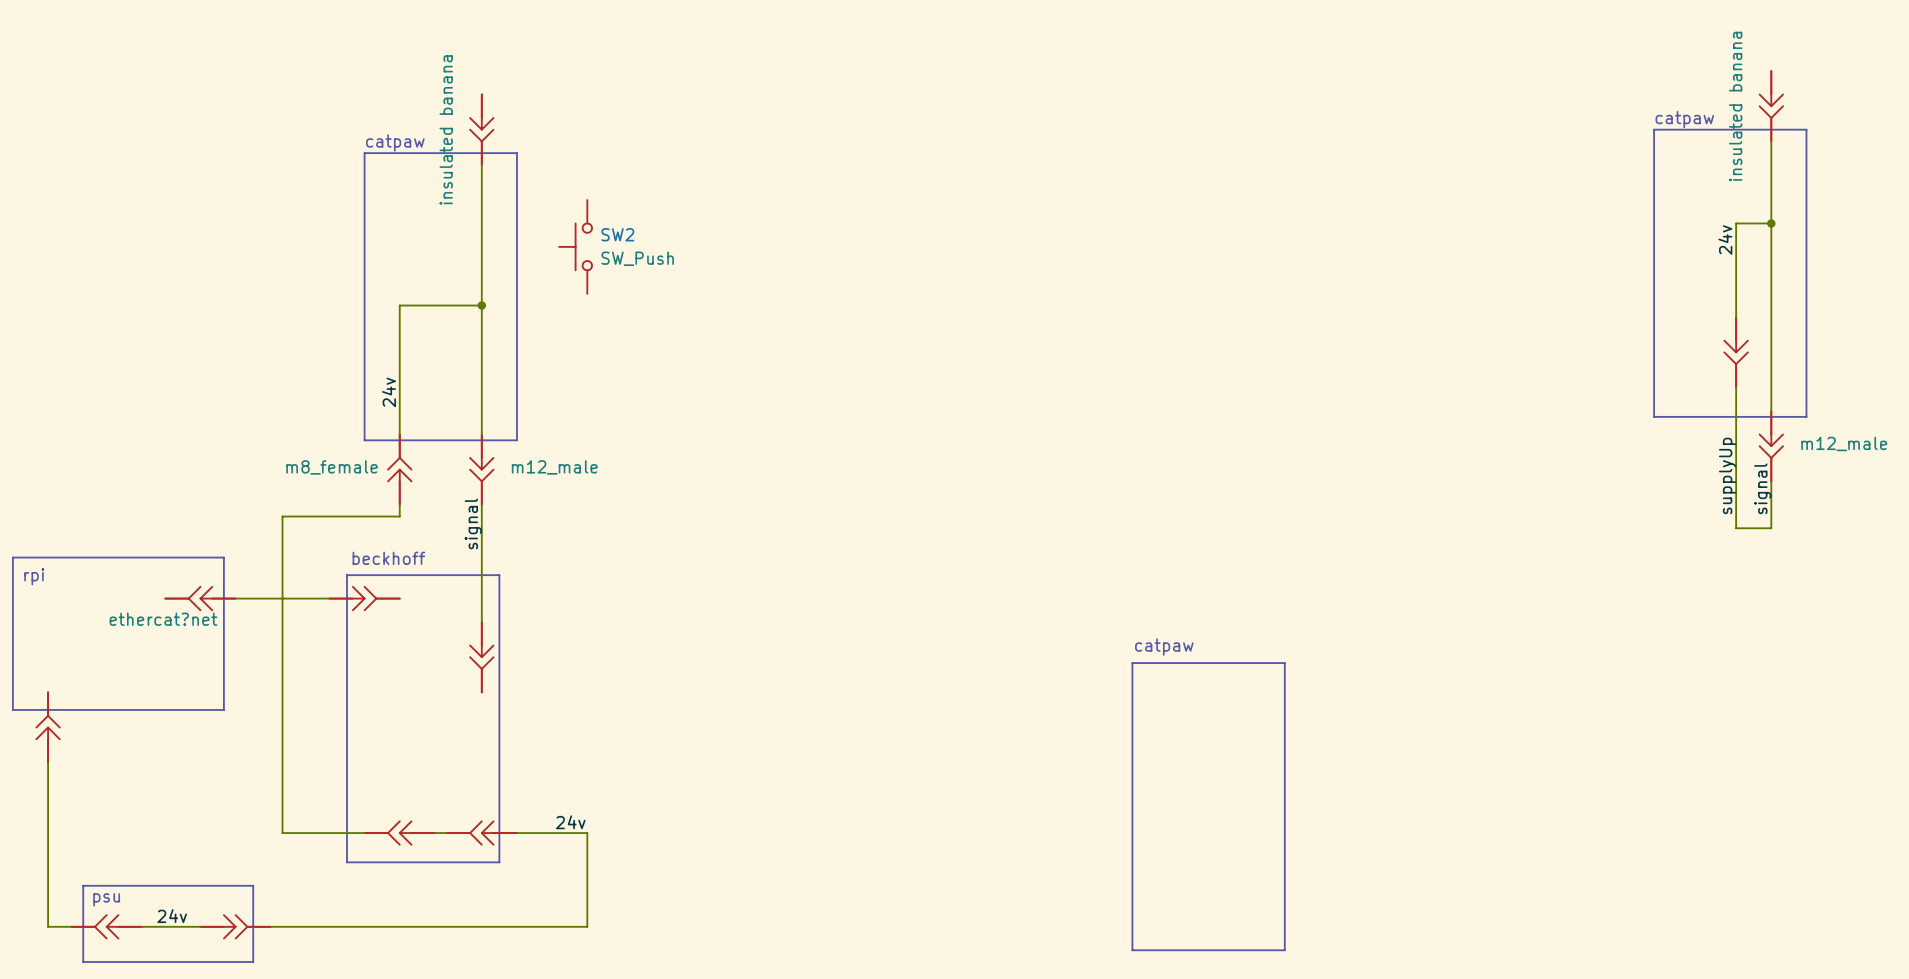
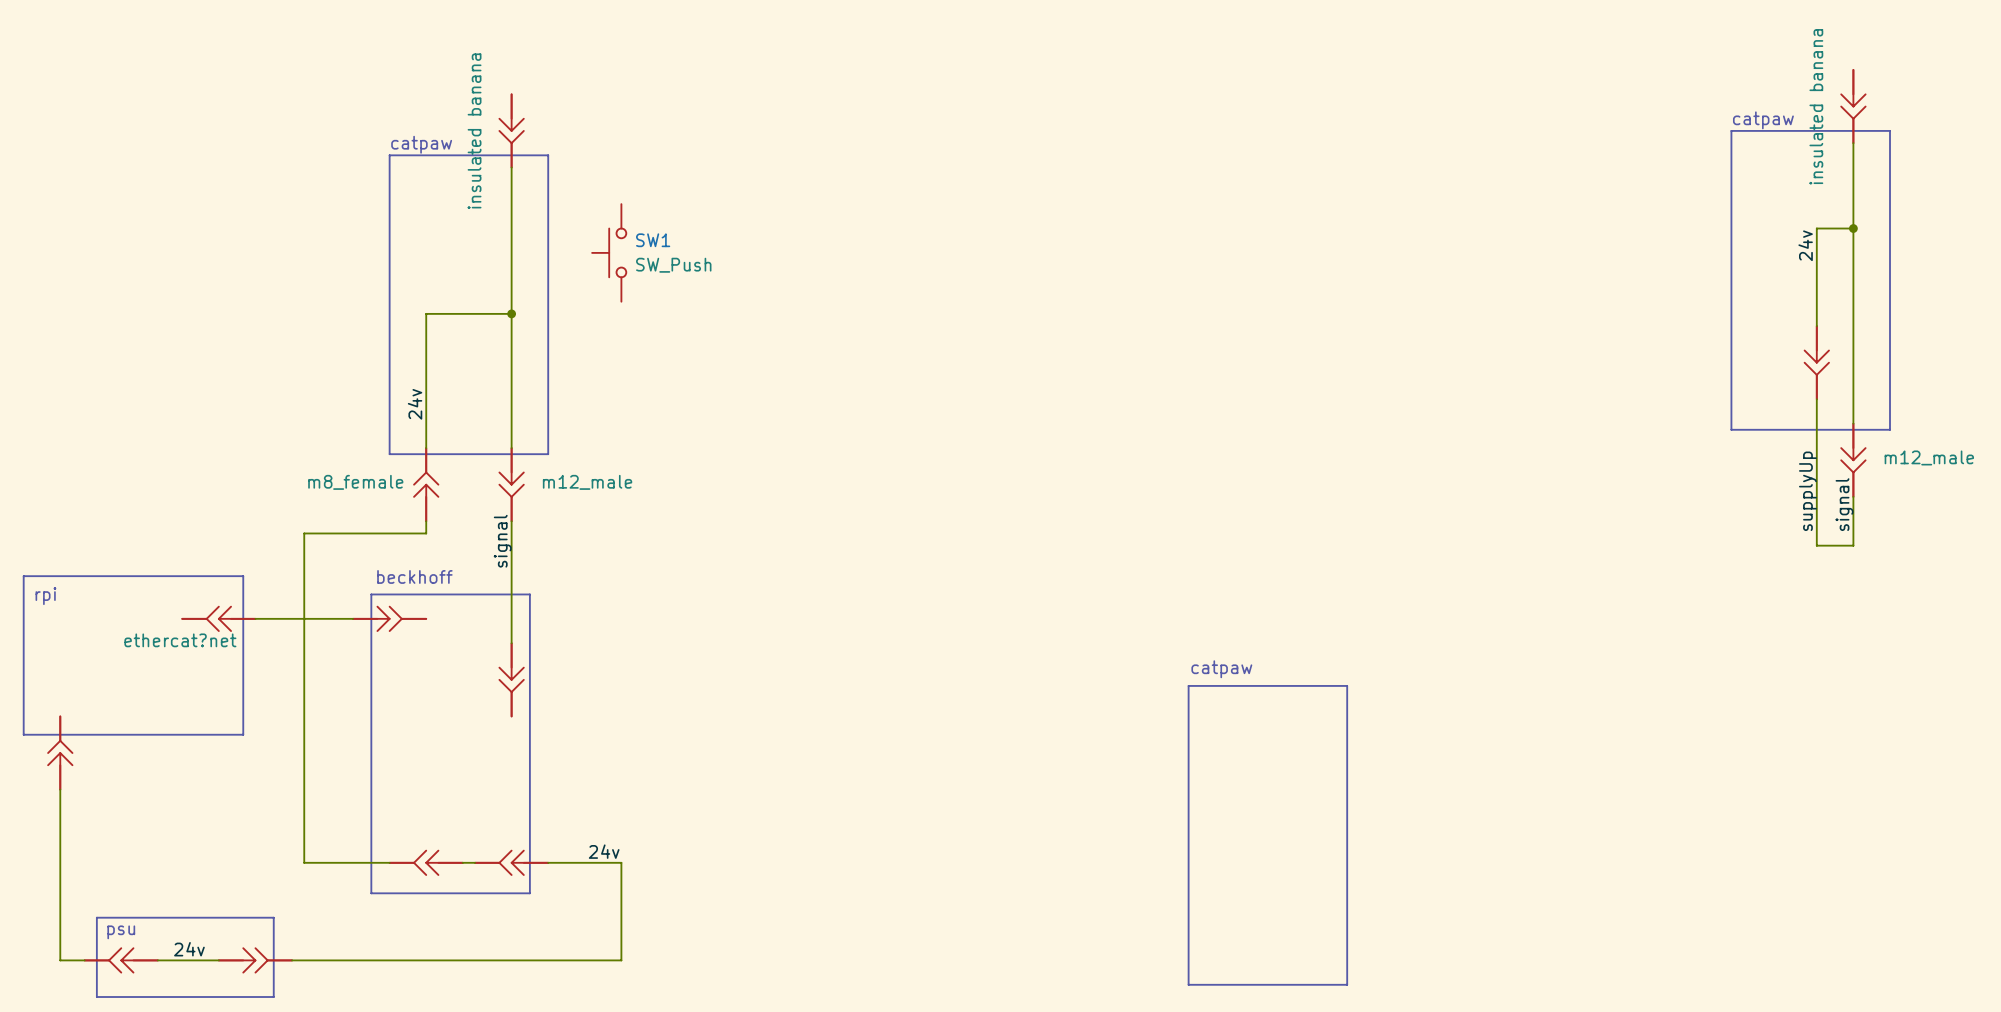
SW2 name: SW2 (617, 234) -> SW1 (653, 240)

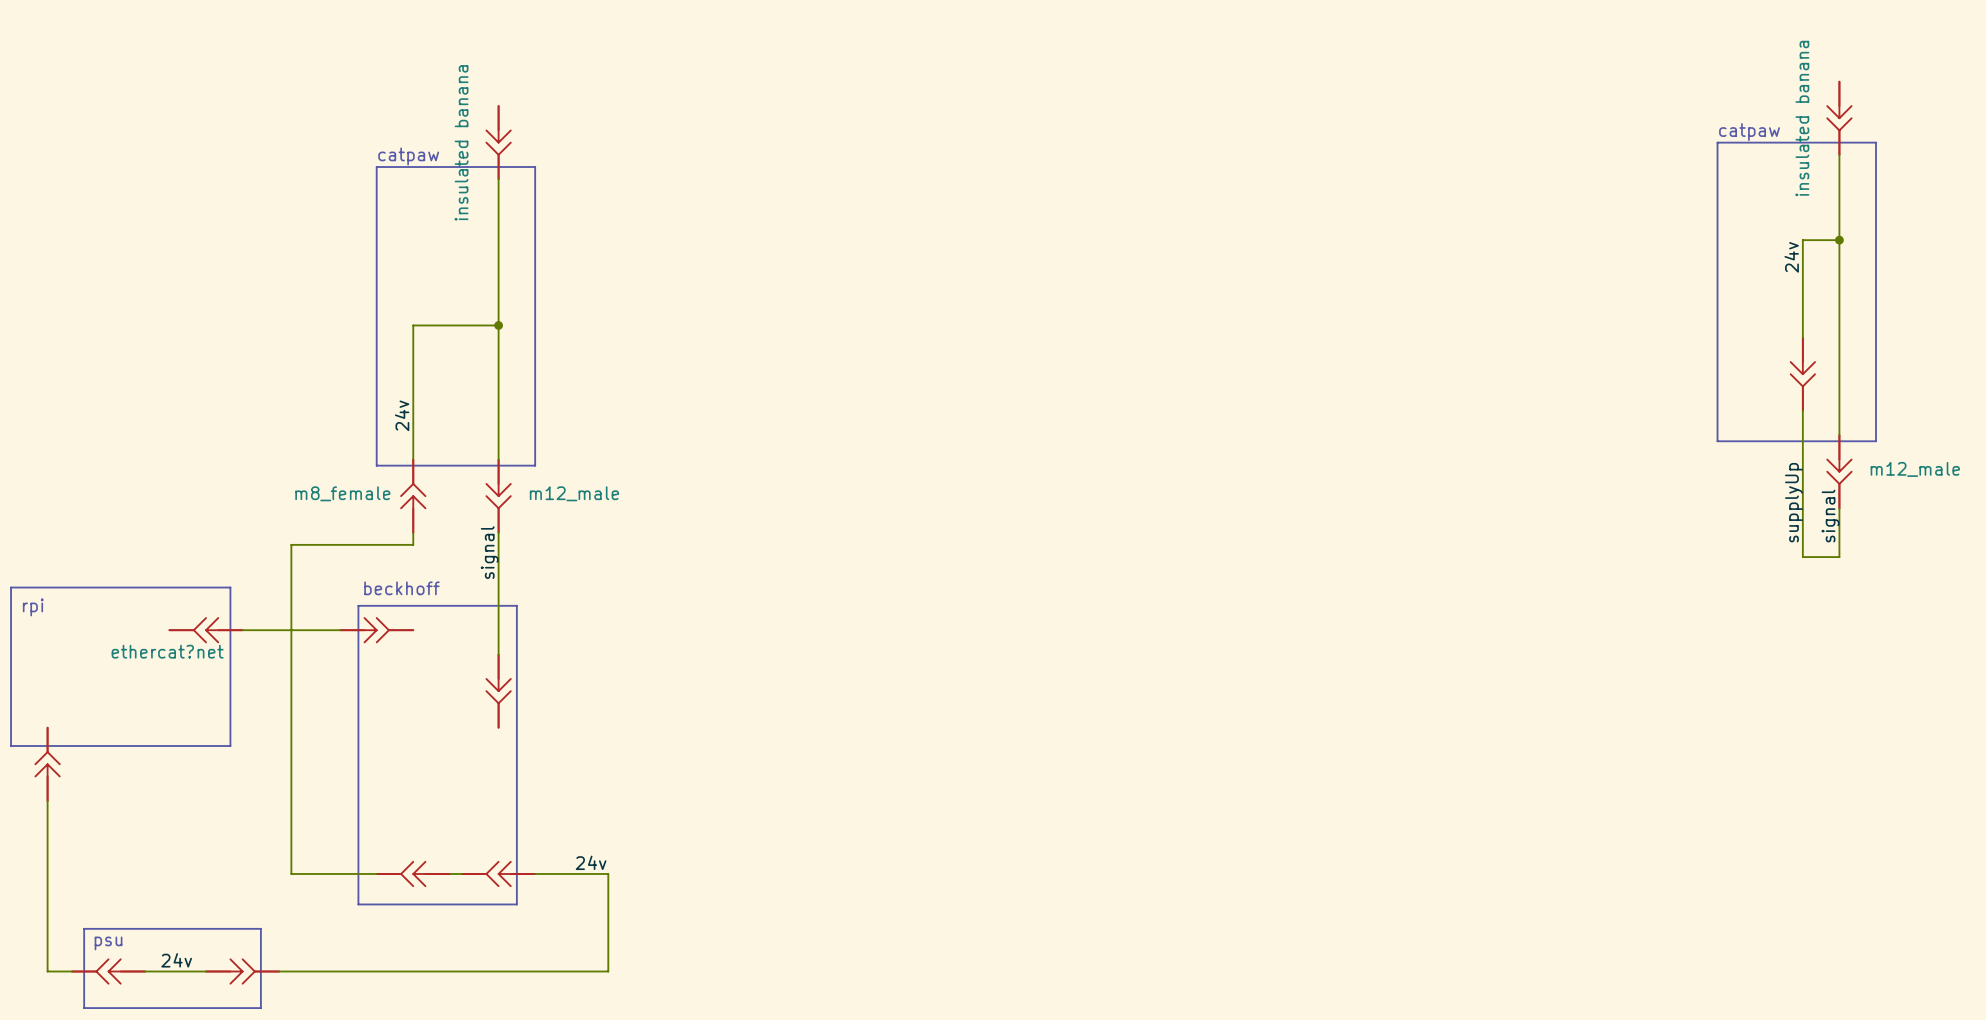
SW1: SW_Push (609, 252) -> none
text: catpaw (1221, 669) -> none
line: (1188, 685) (1347, 685) (1347, 984) (1188, 984) (1188, 685) -> none

